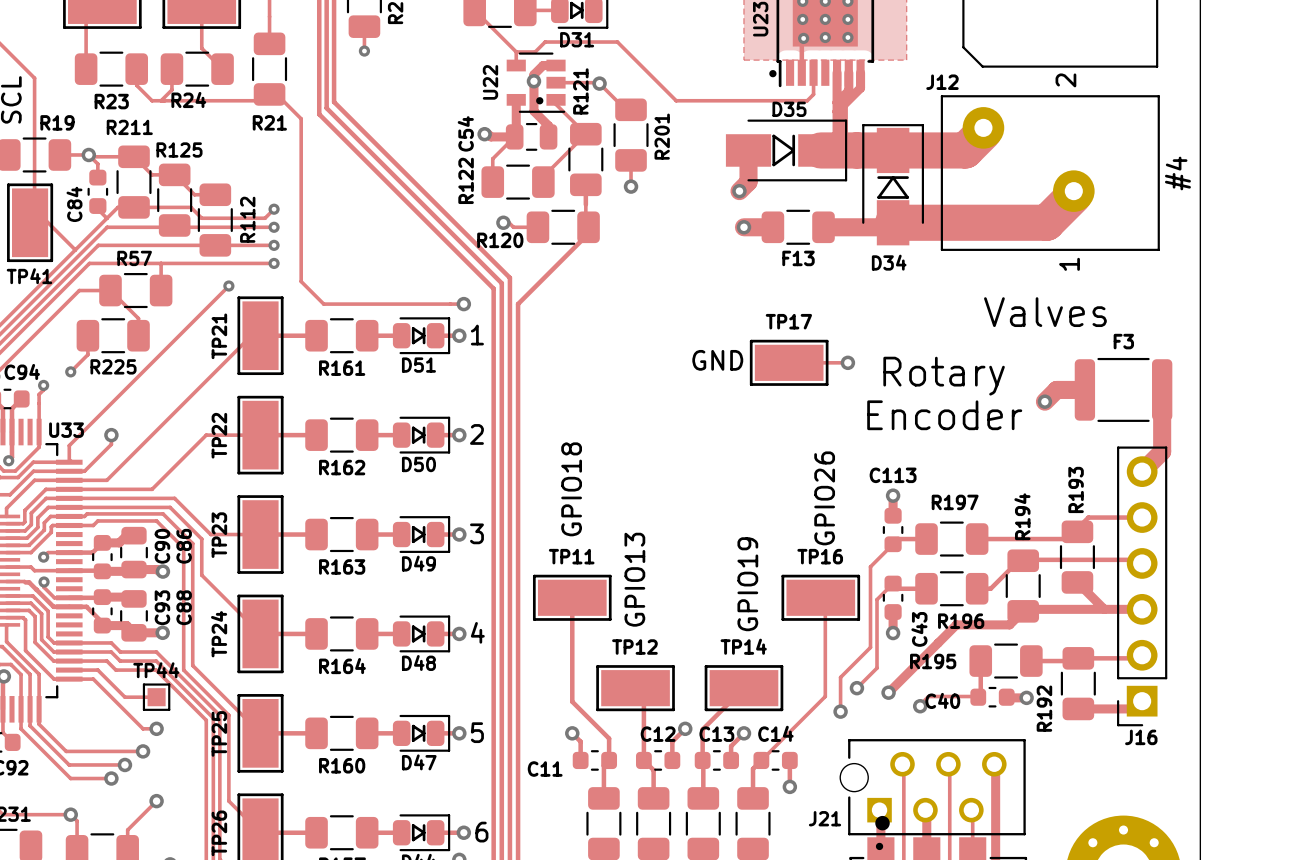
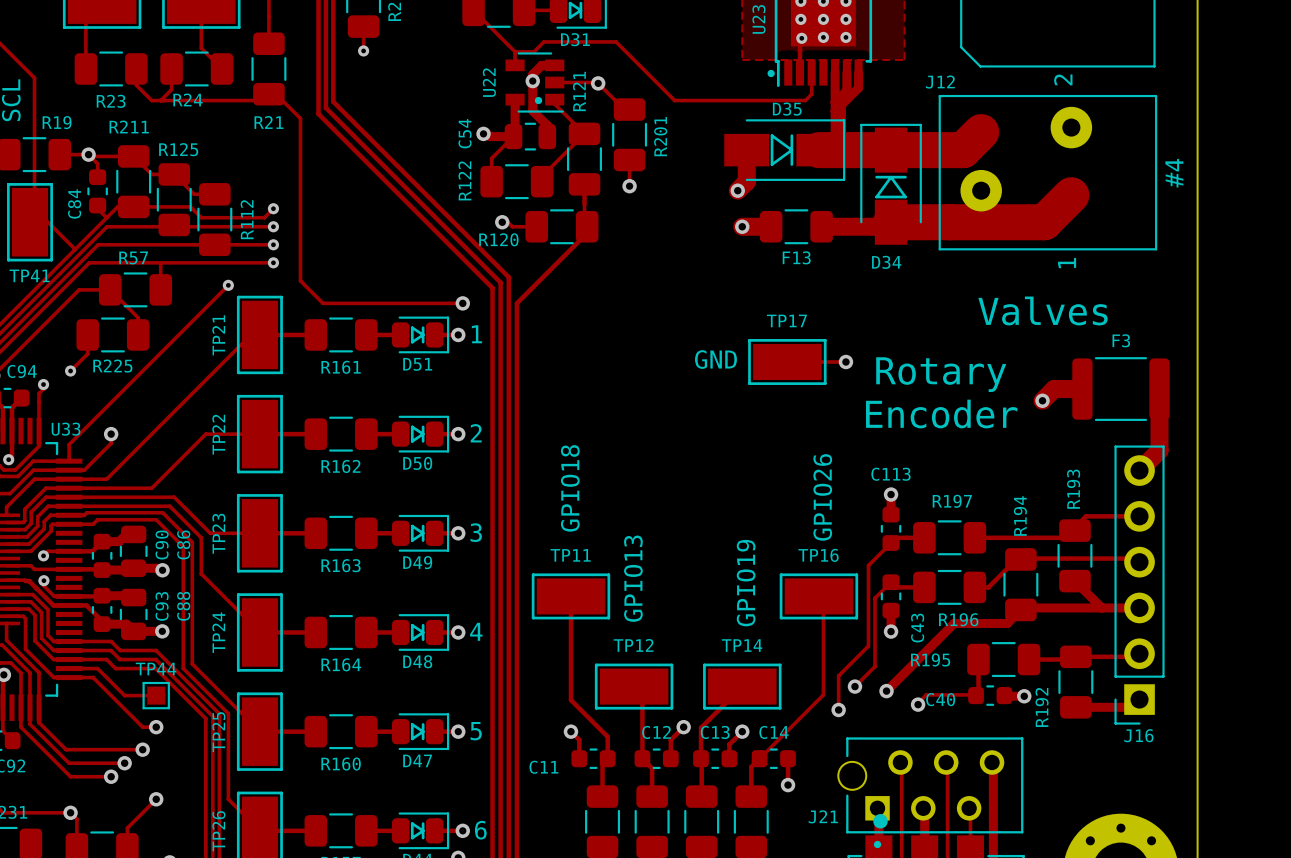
J12 footprint: [940, 95, 1160, 251] -> [938, 94, 1158, 251]

